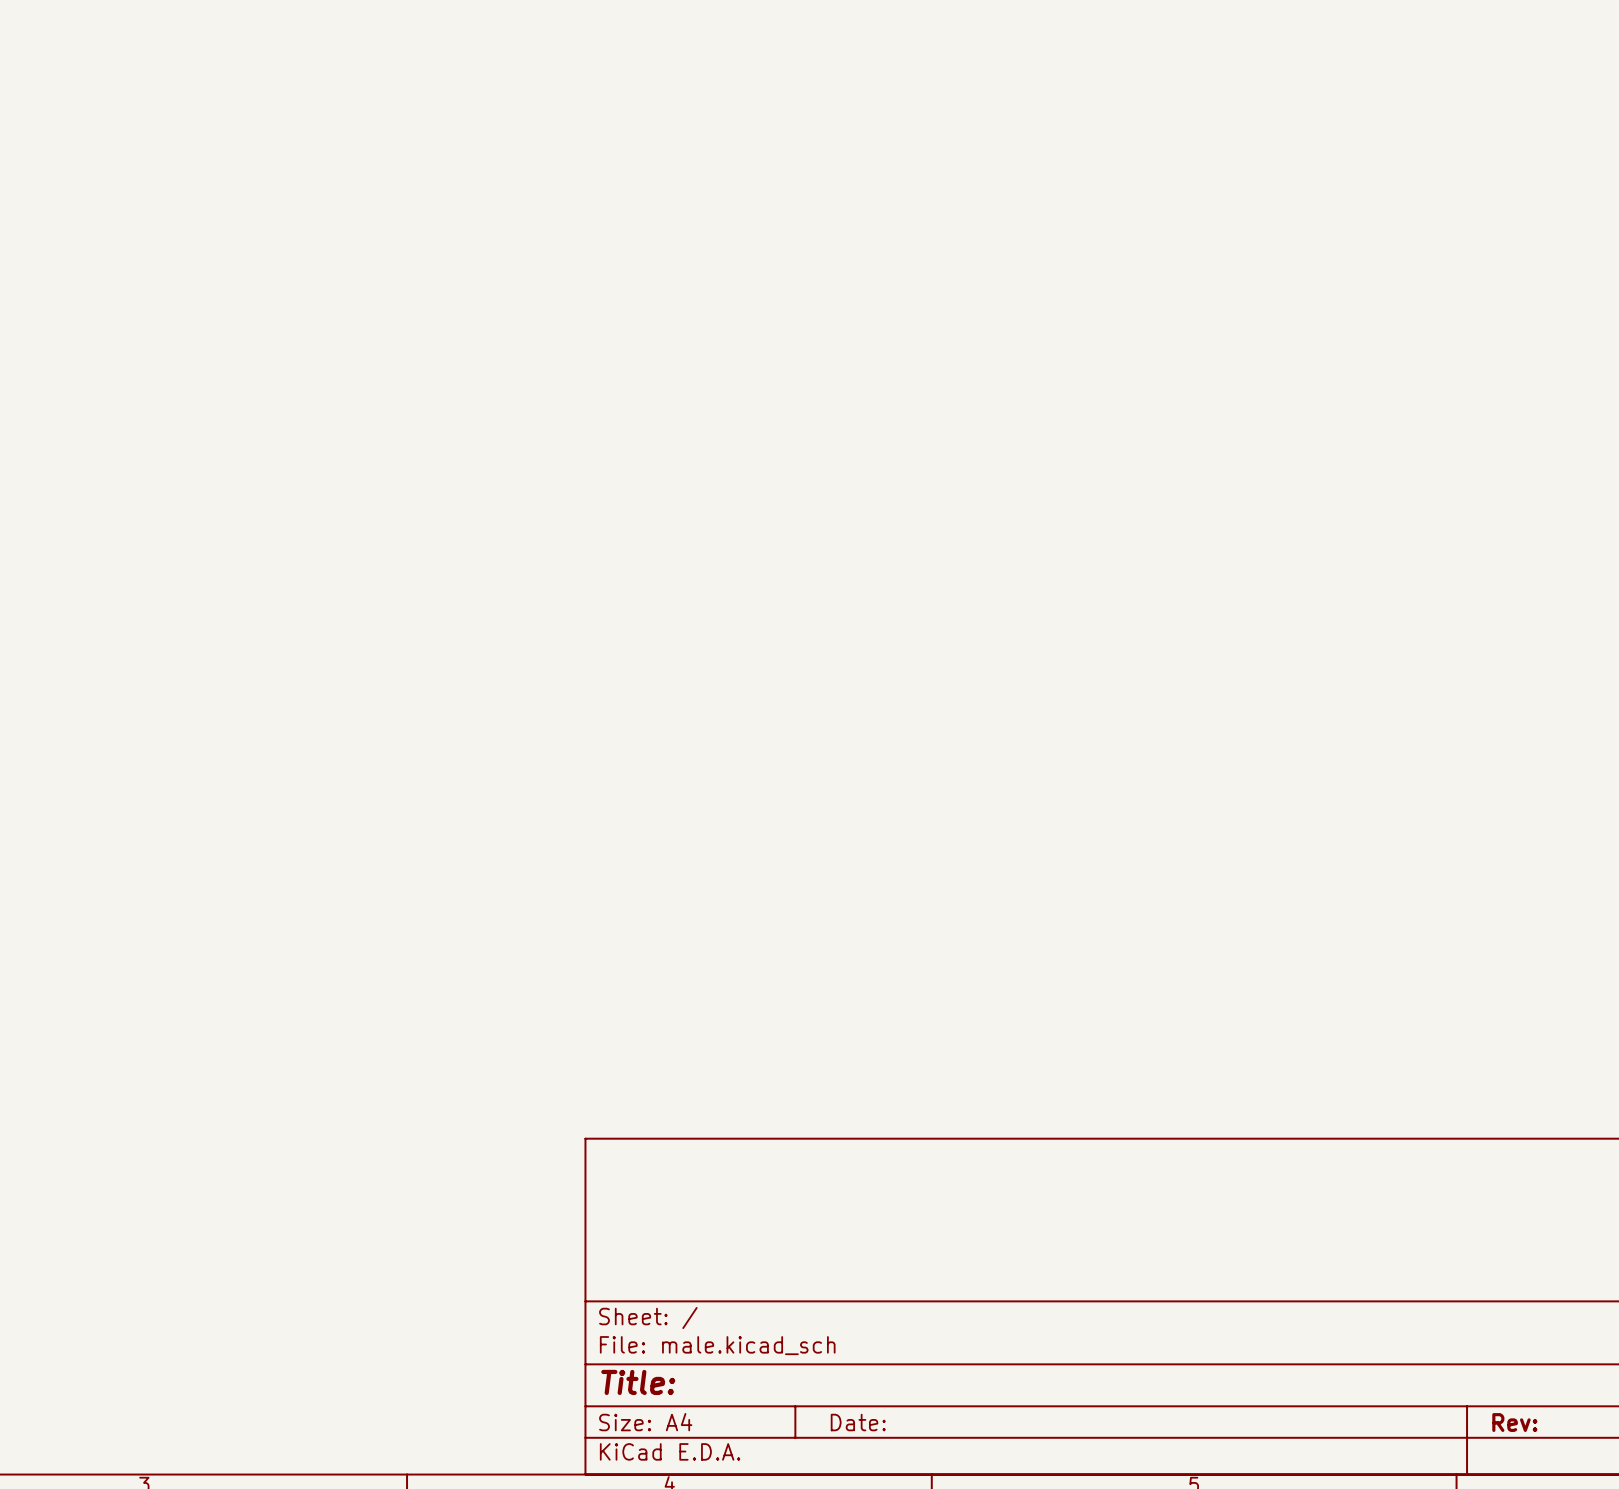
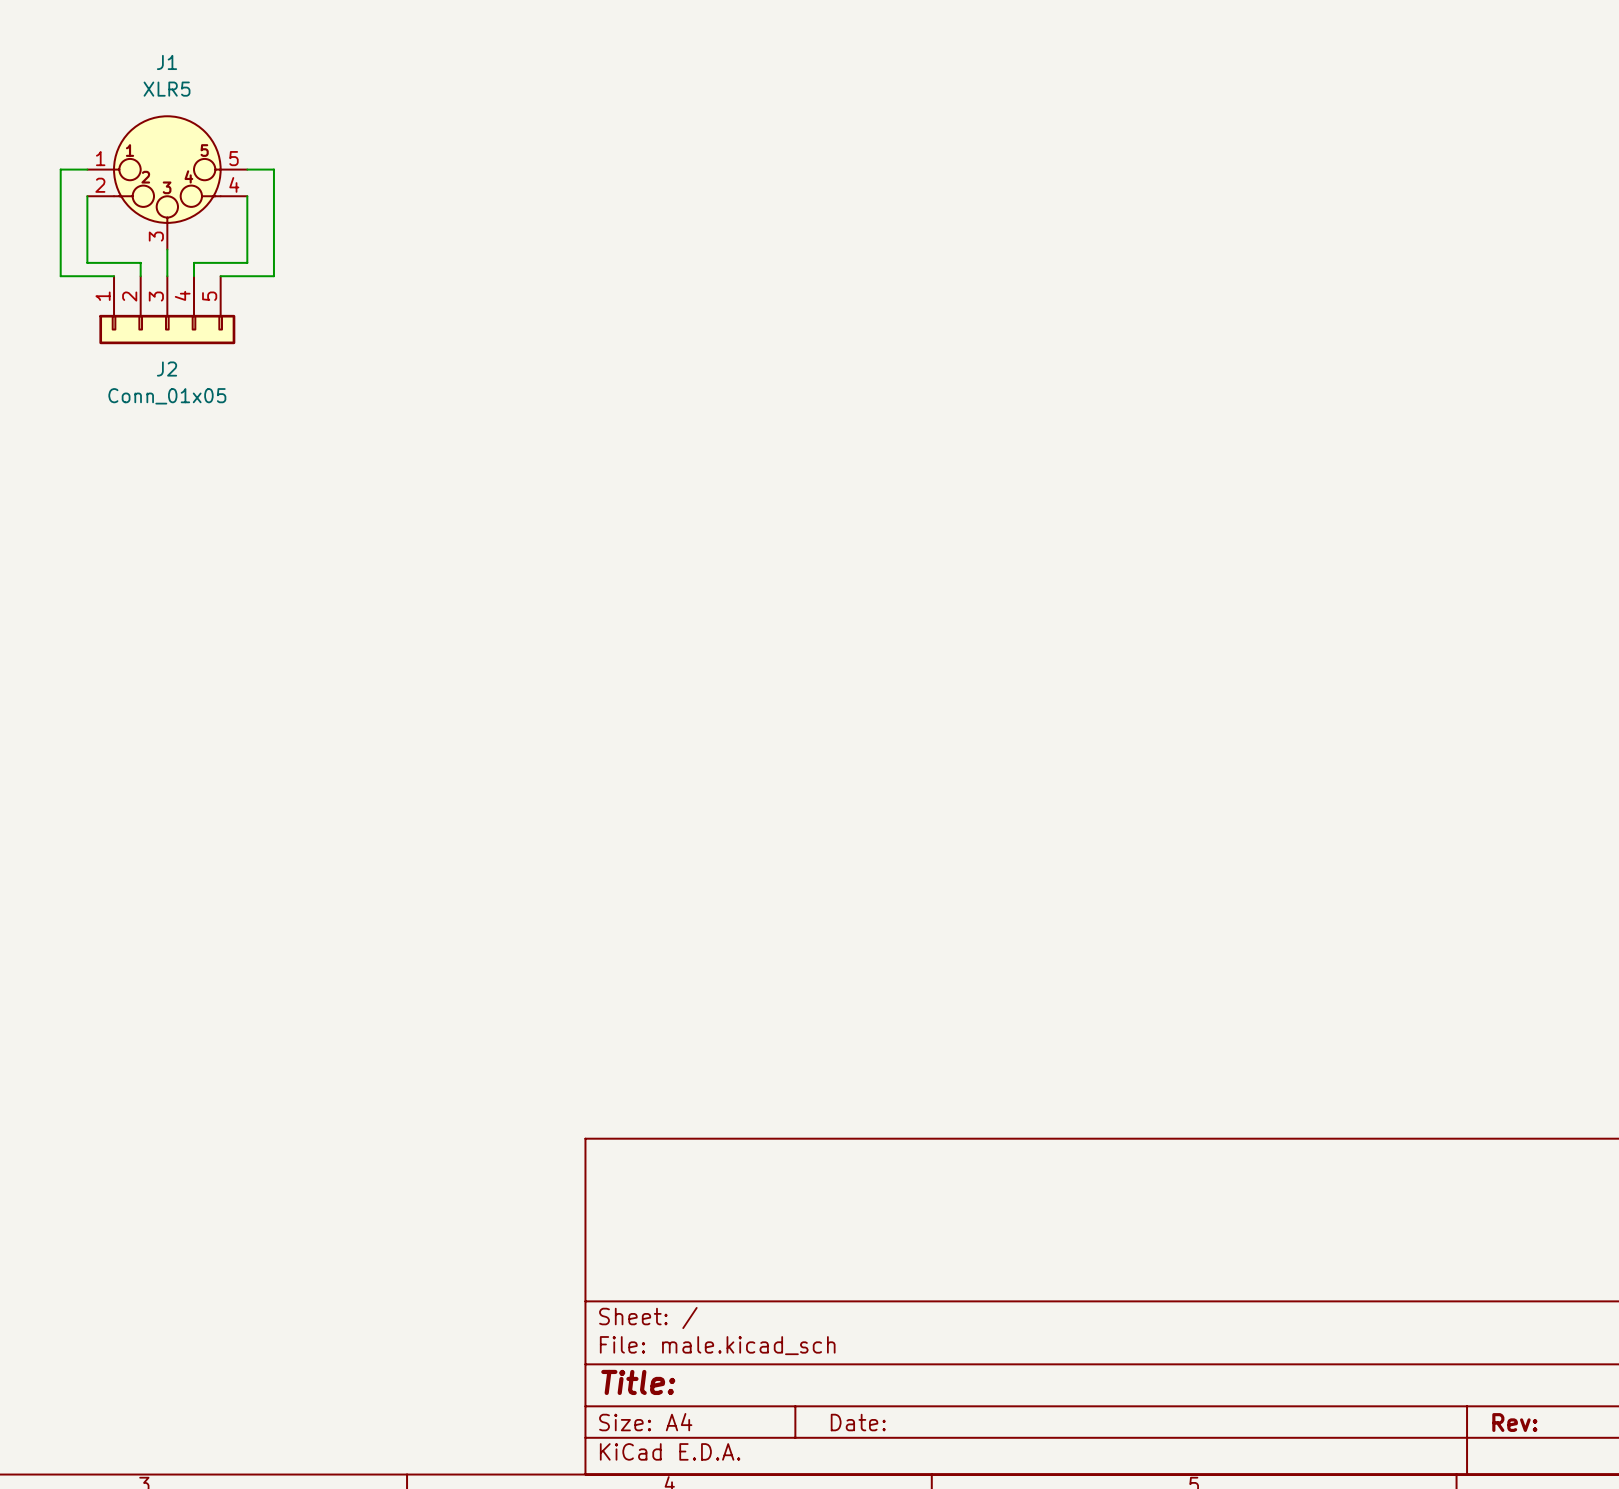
wire: none -> (87, 169) (60, 169) (60, 276) (114, 276)
wire: none -> (247, 169) (273, 169) (273, 276) (220, 276)
J1: none -> XLR5 (167, 182)
wire: none -> (87, 196) (87, 262) (140, 262) (140, 276)
wire: none -> (247, 196) (247, 262) (194, 262) (194, 276)
wire: none -> (167, 249) (167, 276)
J2: none -> Conn_01x05 (167, 310)

